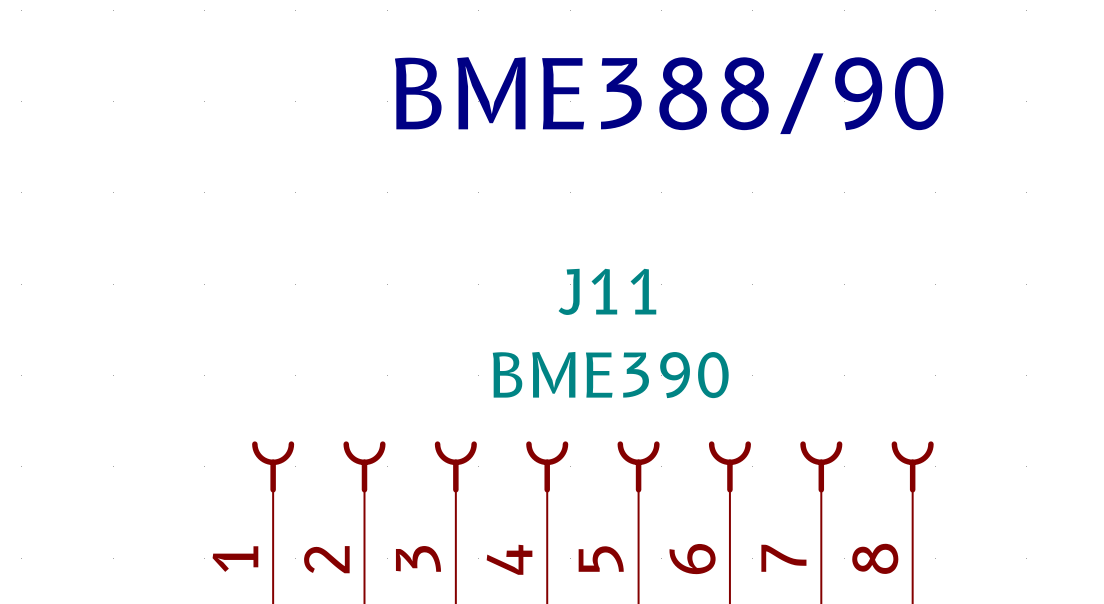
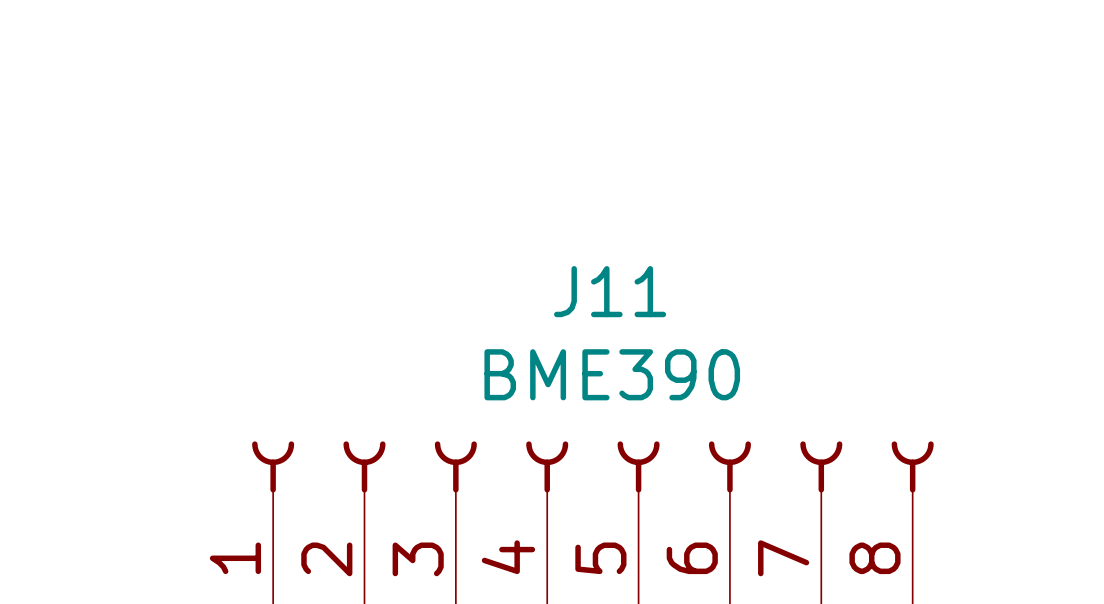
text: BME388/90 (669, 93) -> none

